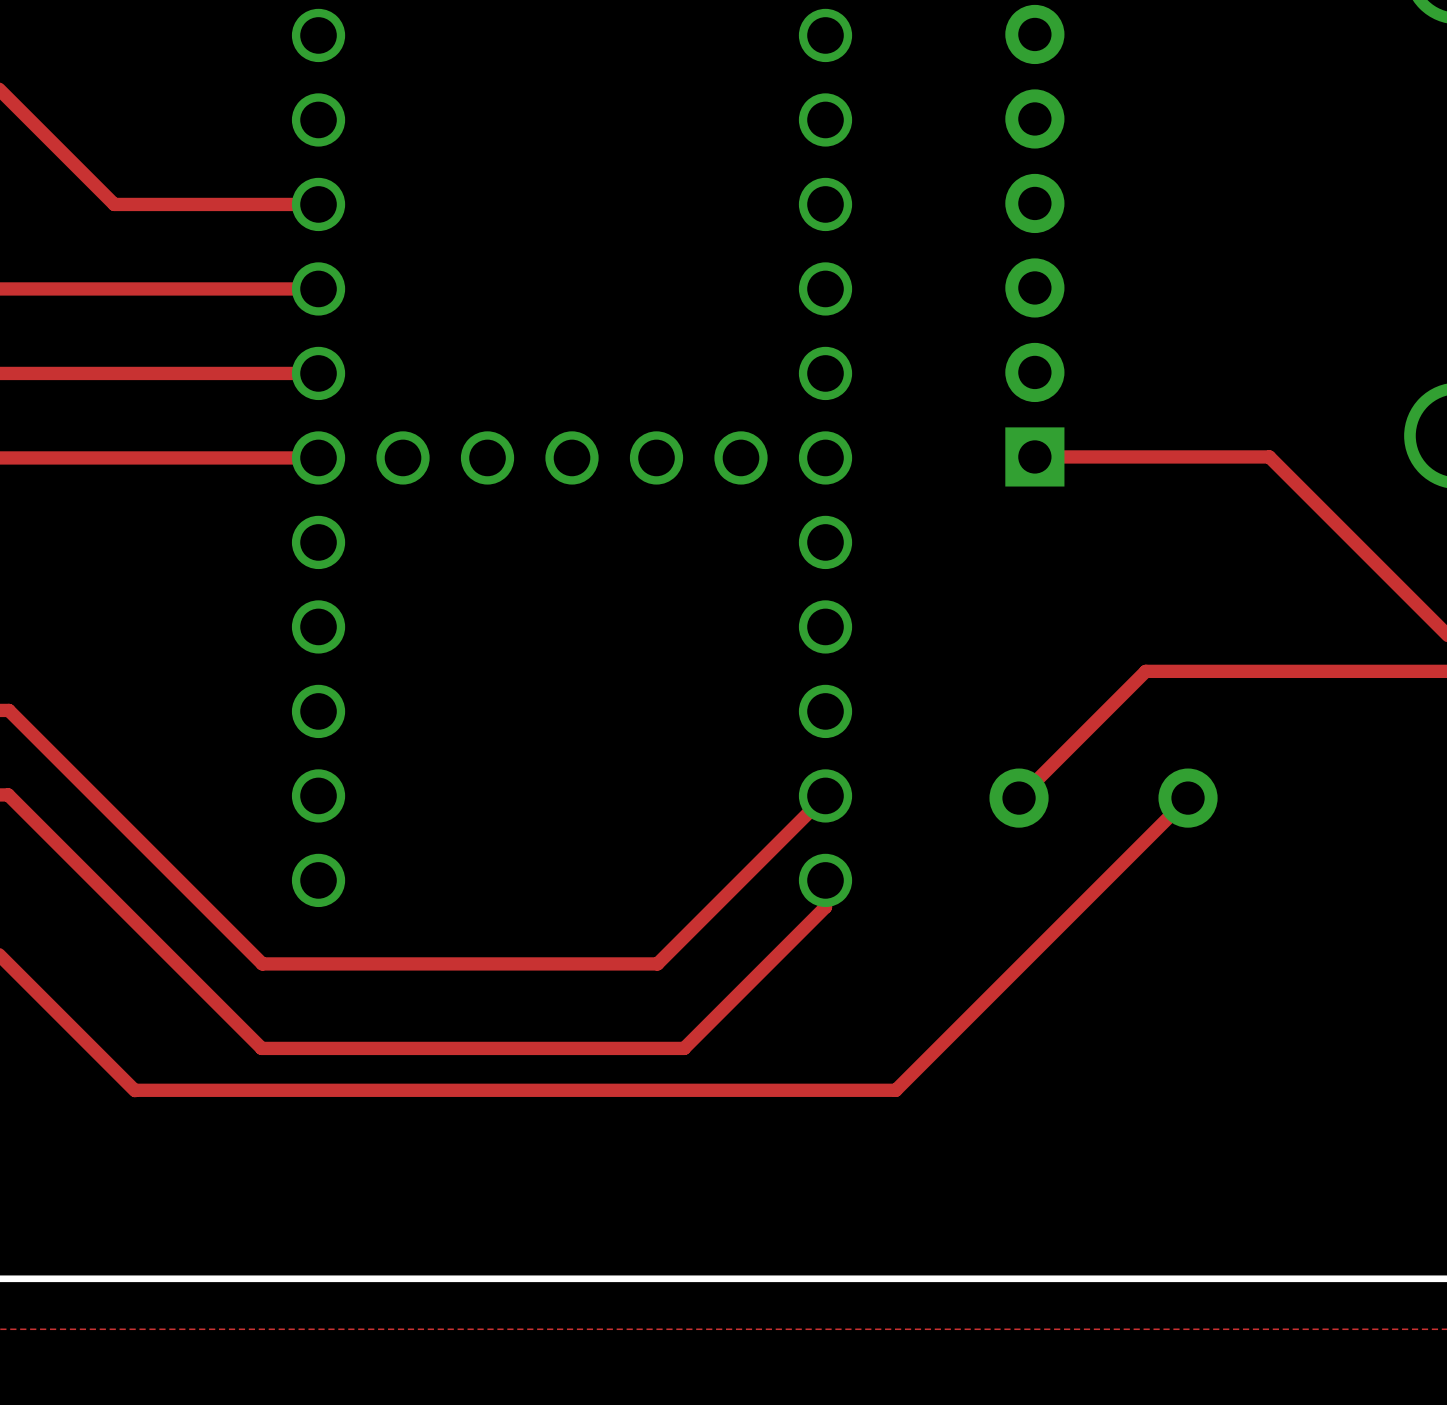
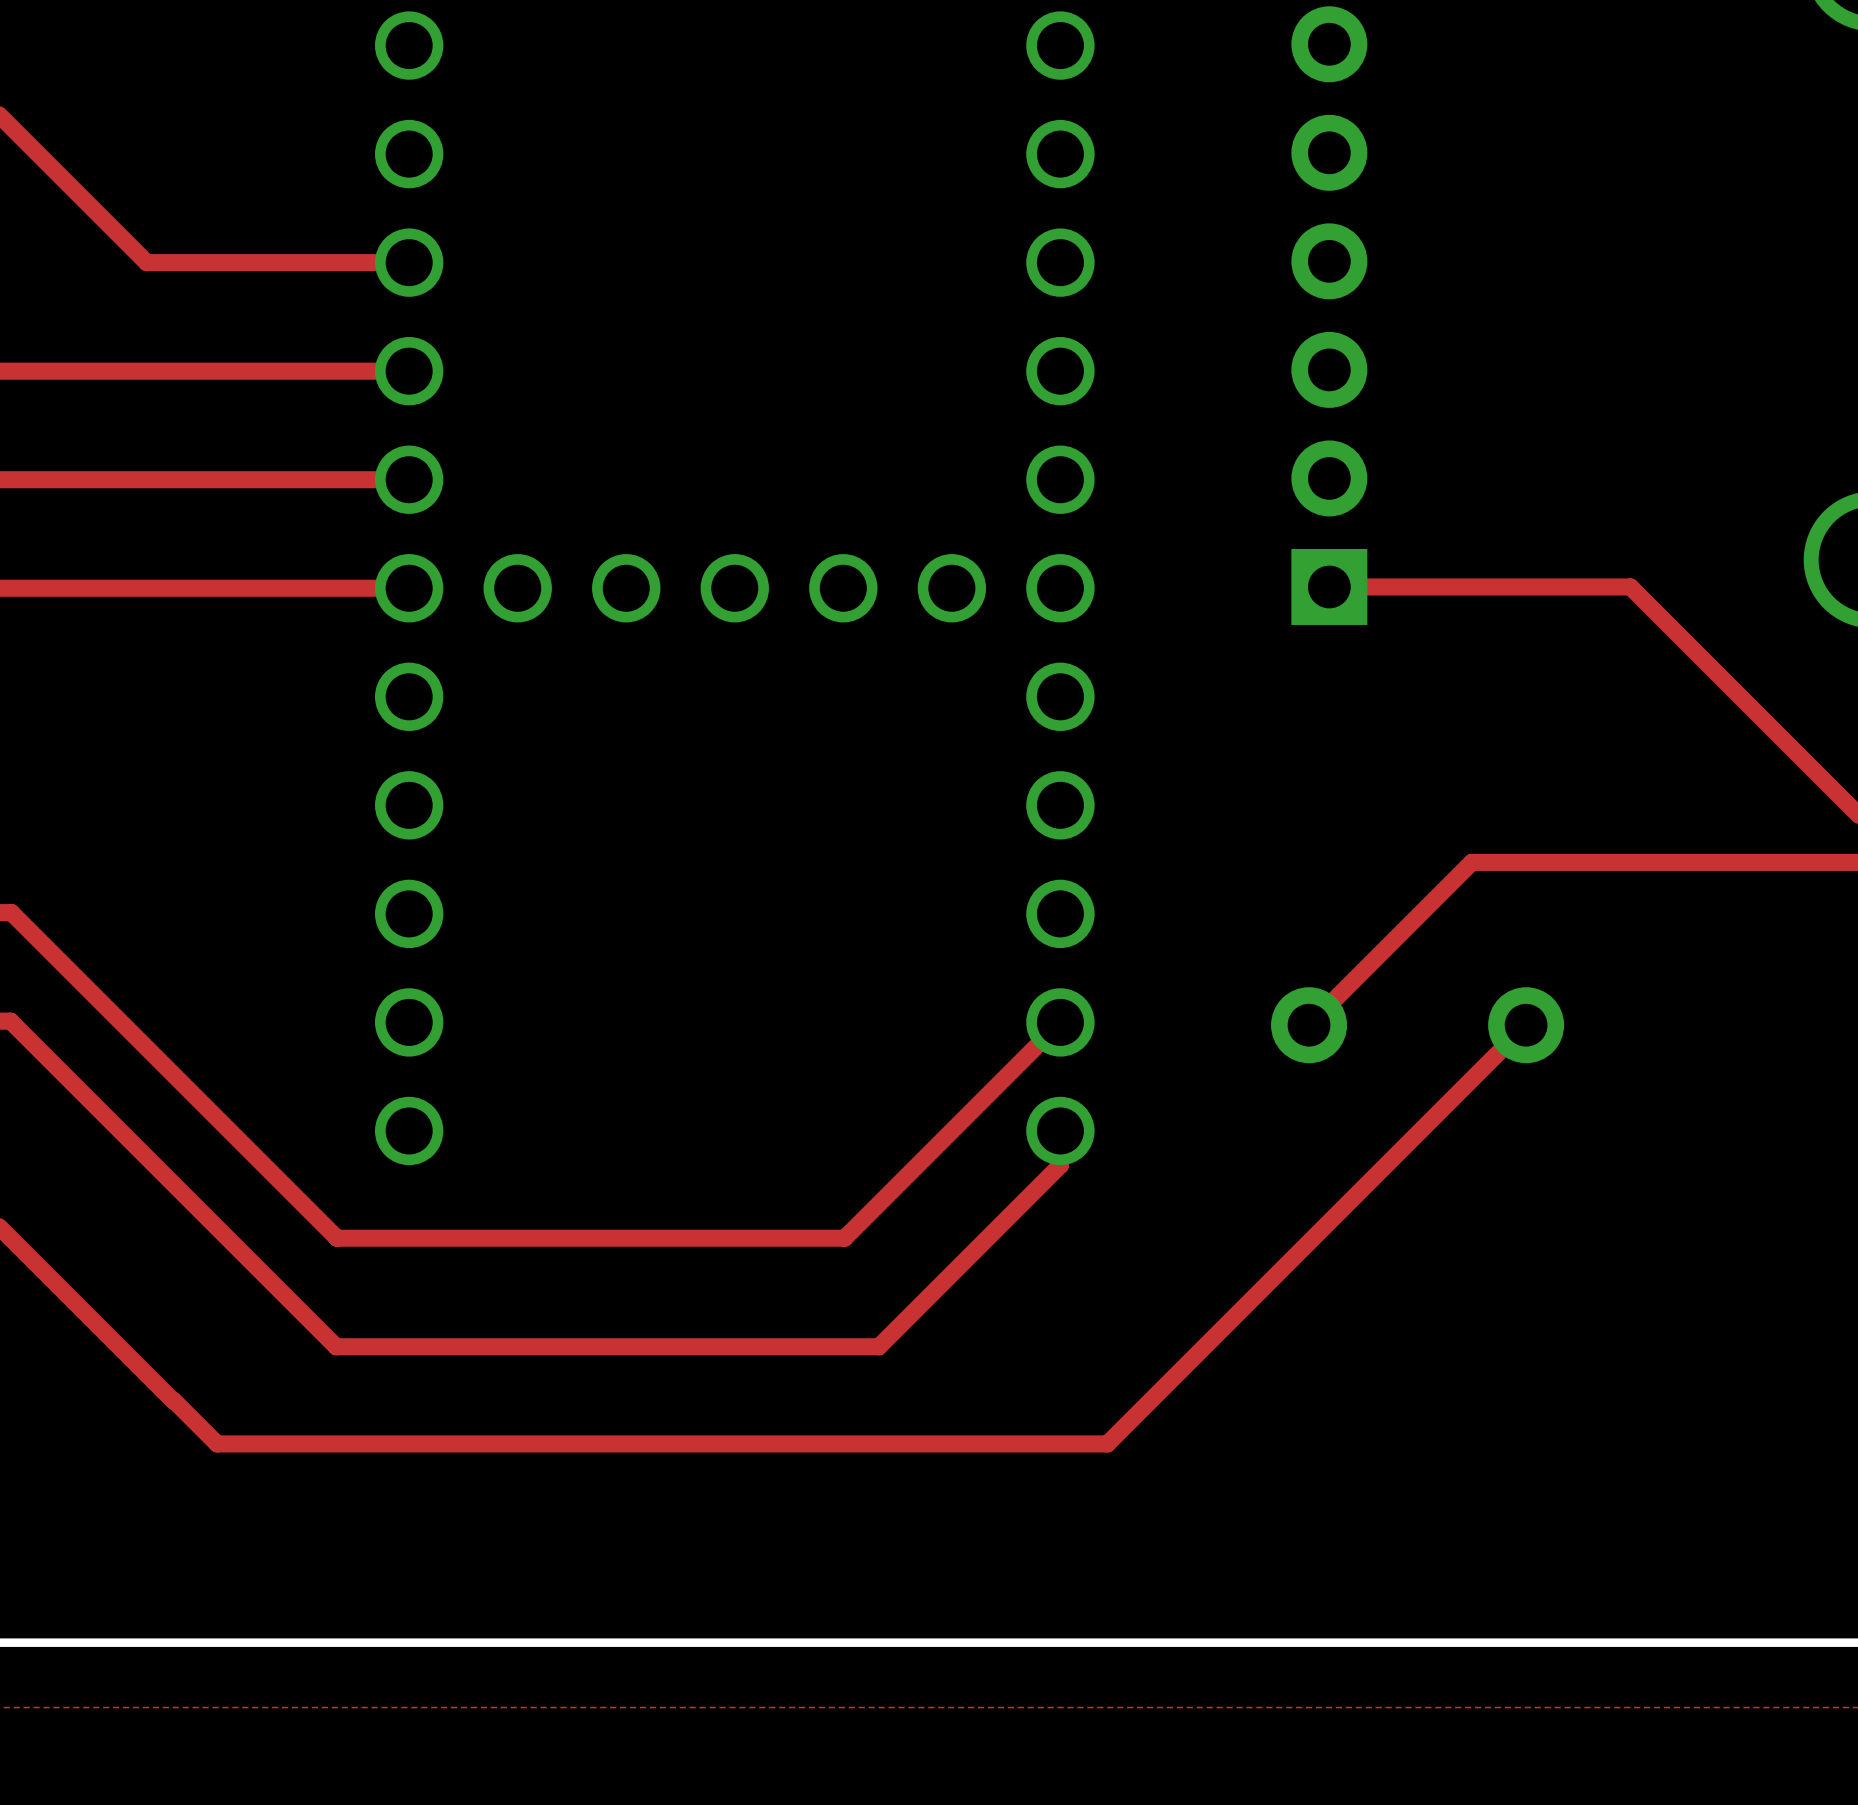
track: (135, 1090) (895, 1090) -> (173, 1400) (217, 1443) (1107, 1443) (1150, 1400)

